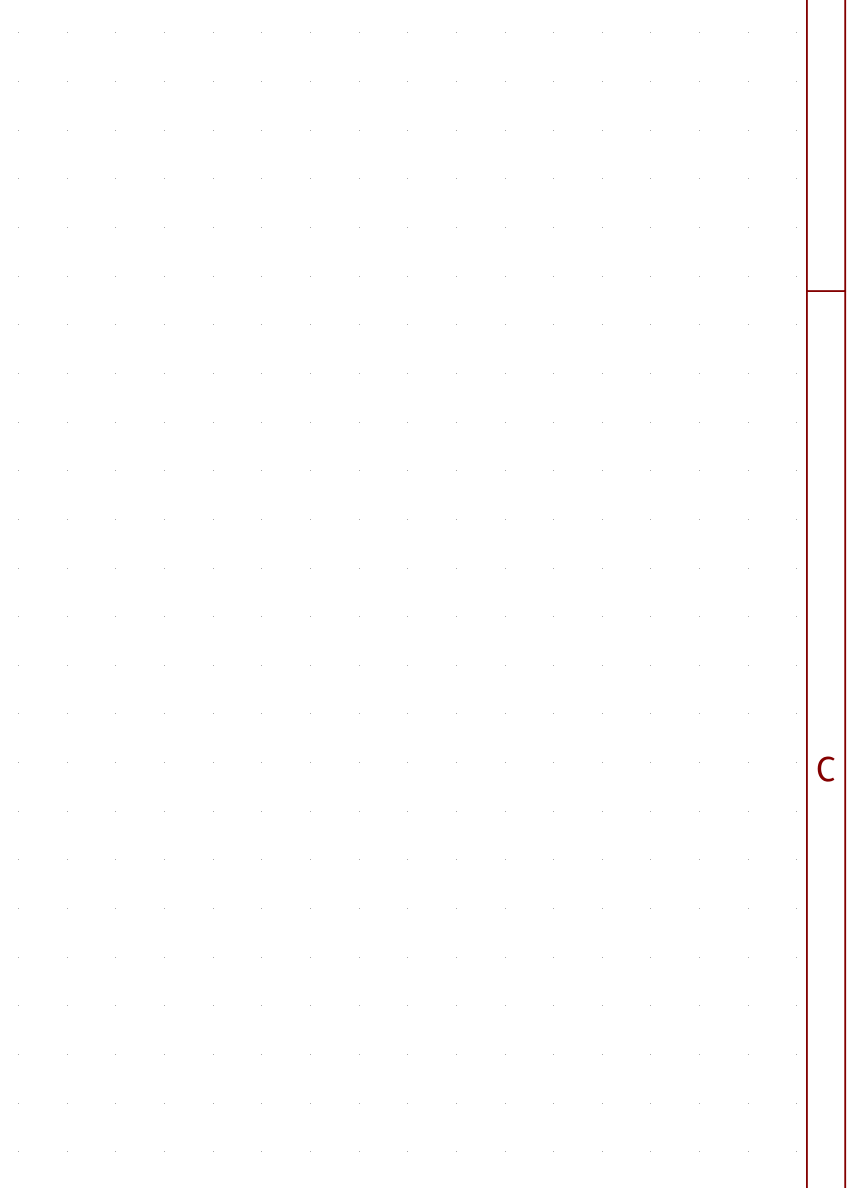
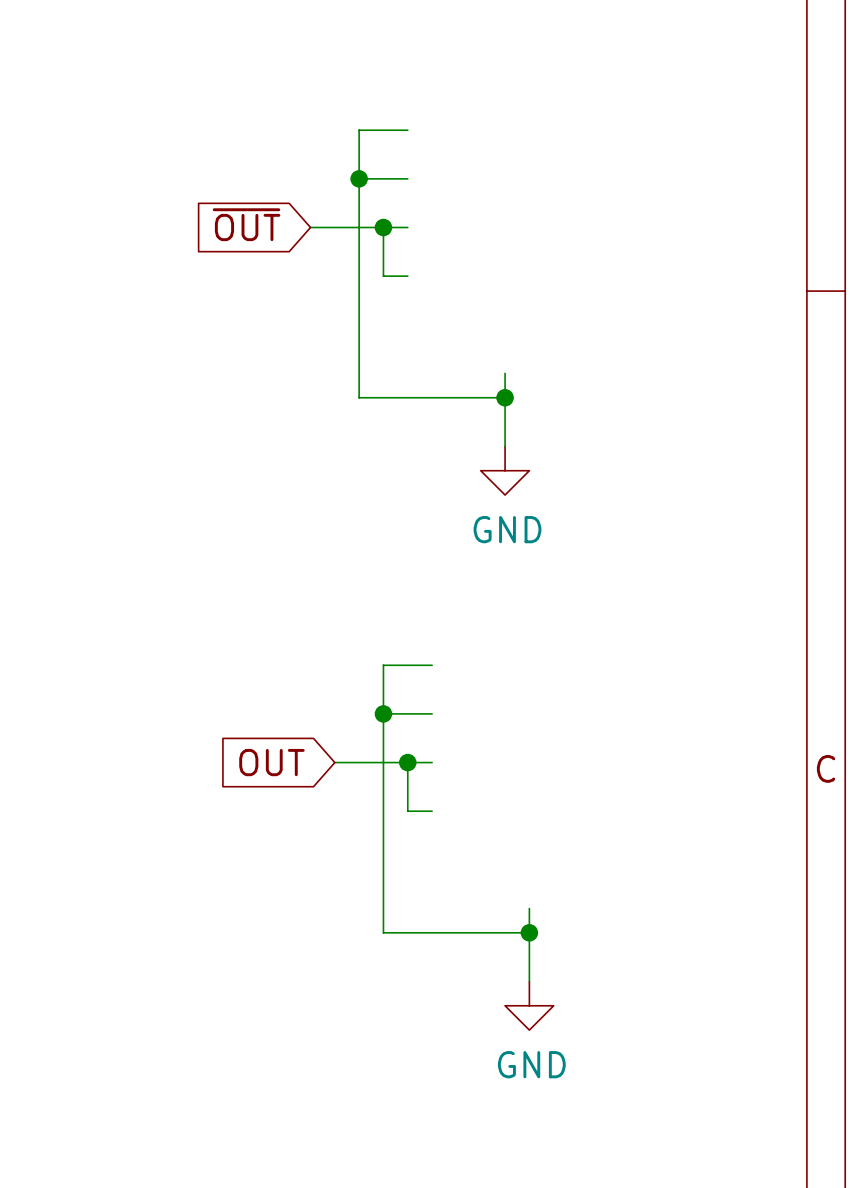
wire: none -> (407, 130) (359, 130) (359, 397) (505, 397)
wire: none -> (359, 178) (407, 178)
junction: none -> (359, 178)
global label: none -> ~{OUT} (246, 224)
wire: none -> (310, 227) (407, 227)
wire: none -> (383, 227) (383, 276) (407, 276)
junction: none -> (383, 227)
wire: none -> (505, 373) (505, 446)
junction: none -> (505, 397)
power symbol: none -> GND (505, 470)
wire: none -> (432, 665) (383, 665) (383, 932) (529, 932)
wire: none -> (383, 713) (432, 713)
junction: none -> (383, 713)
global label: none -> OUT (271, 762)
wire: none -> (334, 762) (432, 762)
wire: none -> (407, 762) (407, 811) (432, 811)
junction: none -> (407, 762)
wire: none -> (529, 908) (529, 981)
junction: none -> (529, 932)
power symbol: none -> GND (529, 1005)

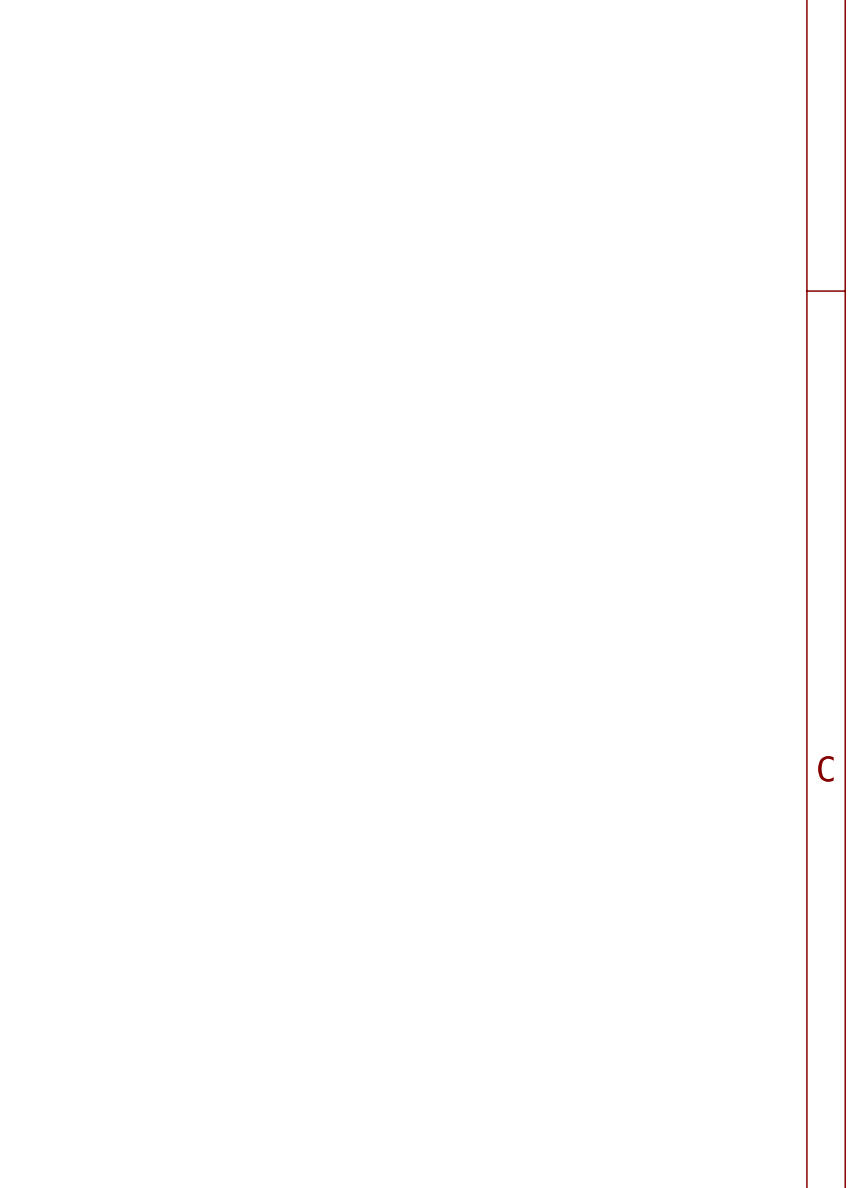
wire: (407, 130) (359, 130) (359, 397) (505, 397) -> none
wire: (359, 178) (407, 178) -> none
junction: (359, 178) -> none
global label: ~{OUT} (246, 224) -> none
wire: (310, 227) (407, 227) -> none
wire: (383, 227) (383, 276) (407, 276) -> none
junction: (383, 227) -> none
wire: (505, 373) (505, 446) -> none
junction: (505, 397) -> none
power symbol: GND (505, 470) -> none
wire: (432, 665) (383, 665) (383, 932) (529, 932) -> none
wire: (383, 713) (432, 713) -> none
junction: (383, 713) -> none
global label: OUT (271, 762) -> none
wire: (334, 762) (432, 762) -> none
wire: (407, 762) (407, 811) (432, 811) -> none
junction: (407, 762) -> none
wire: (529, 908) (529, 981) -> none
junction: (529, 932) -> none
power symbol: GND (529, 1005) -> none

